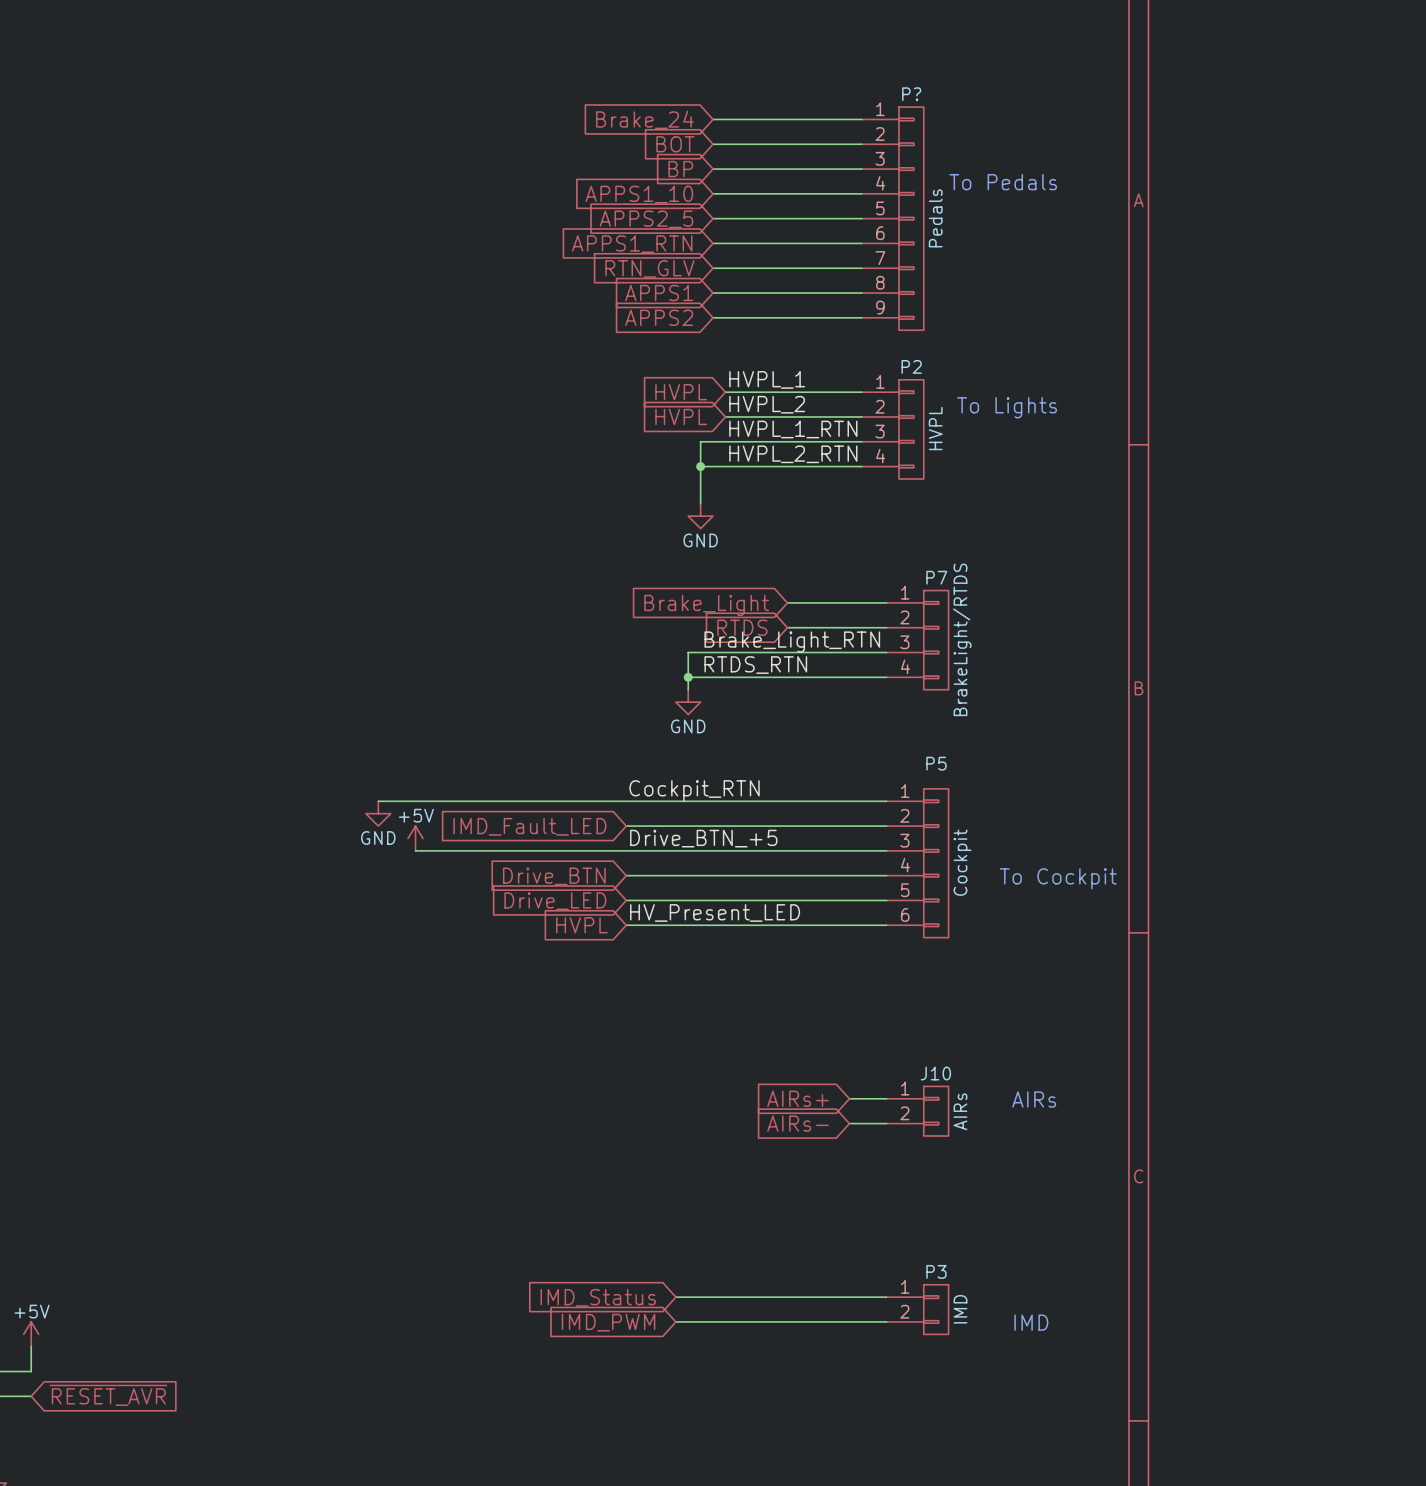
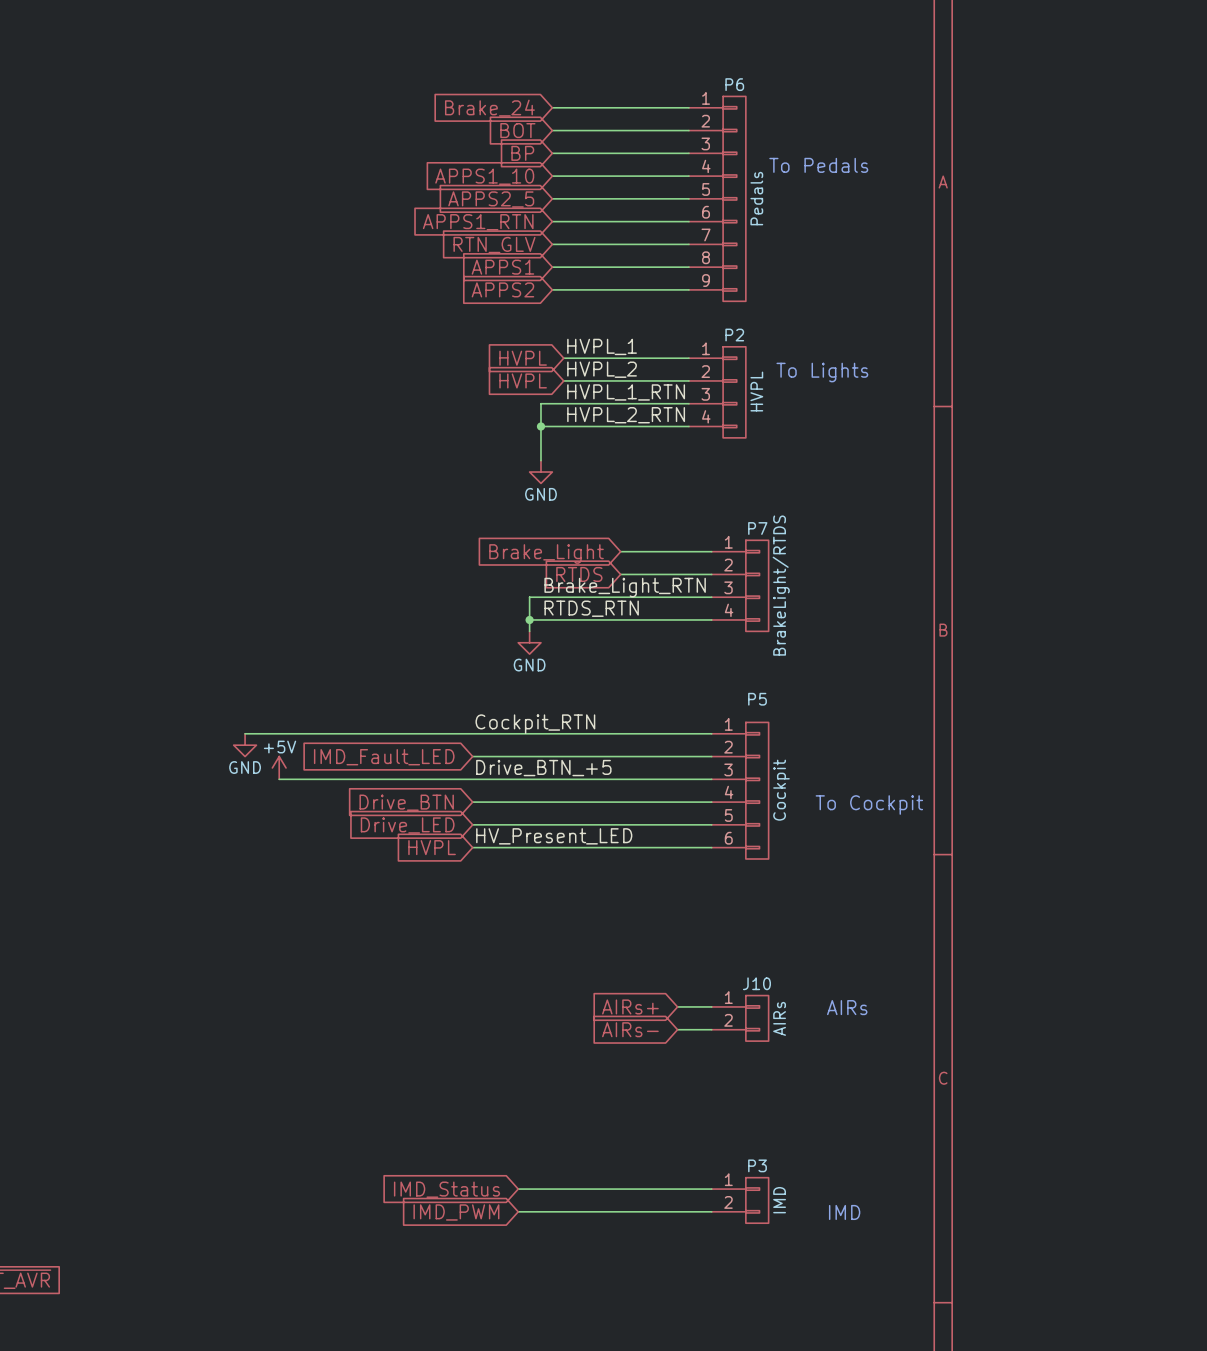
P? name: P? (911, 94) -> P6 (734, 84)

